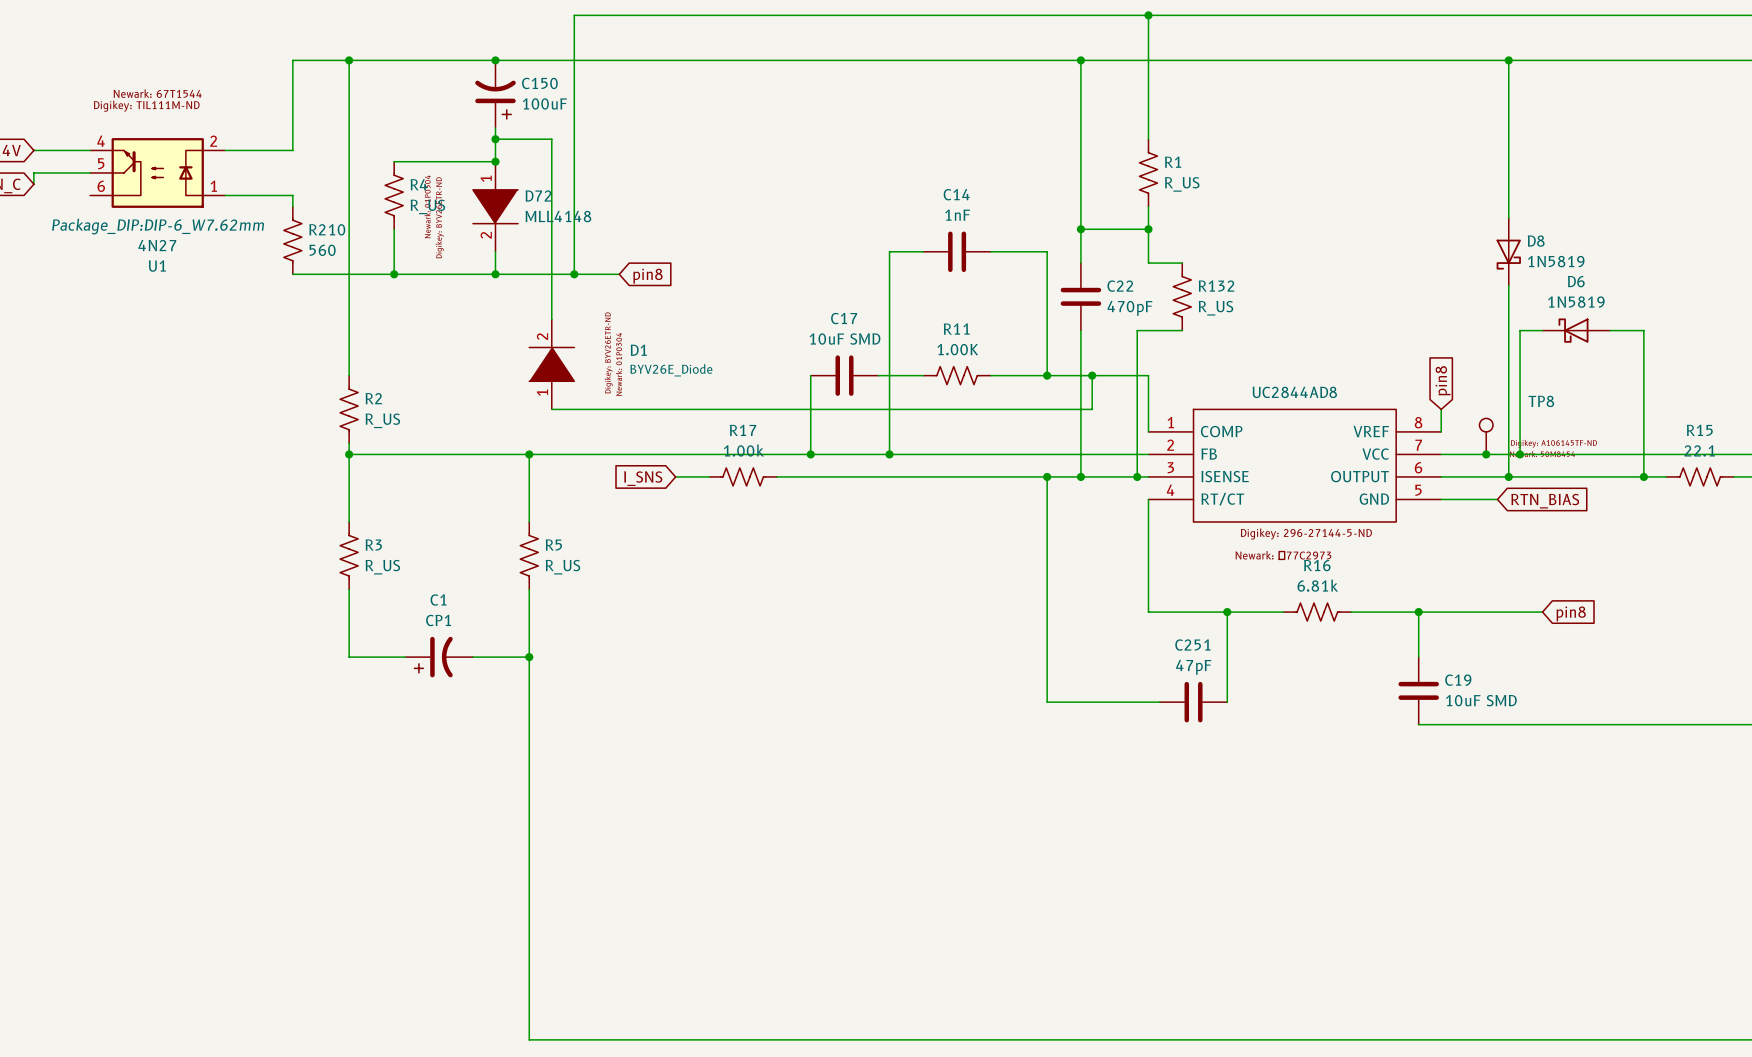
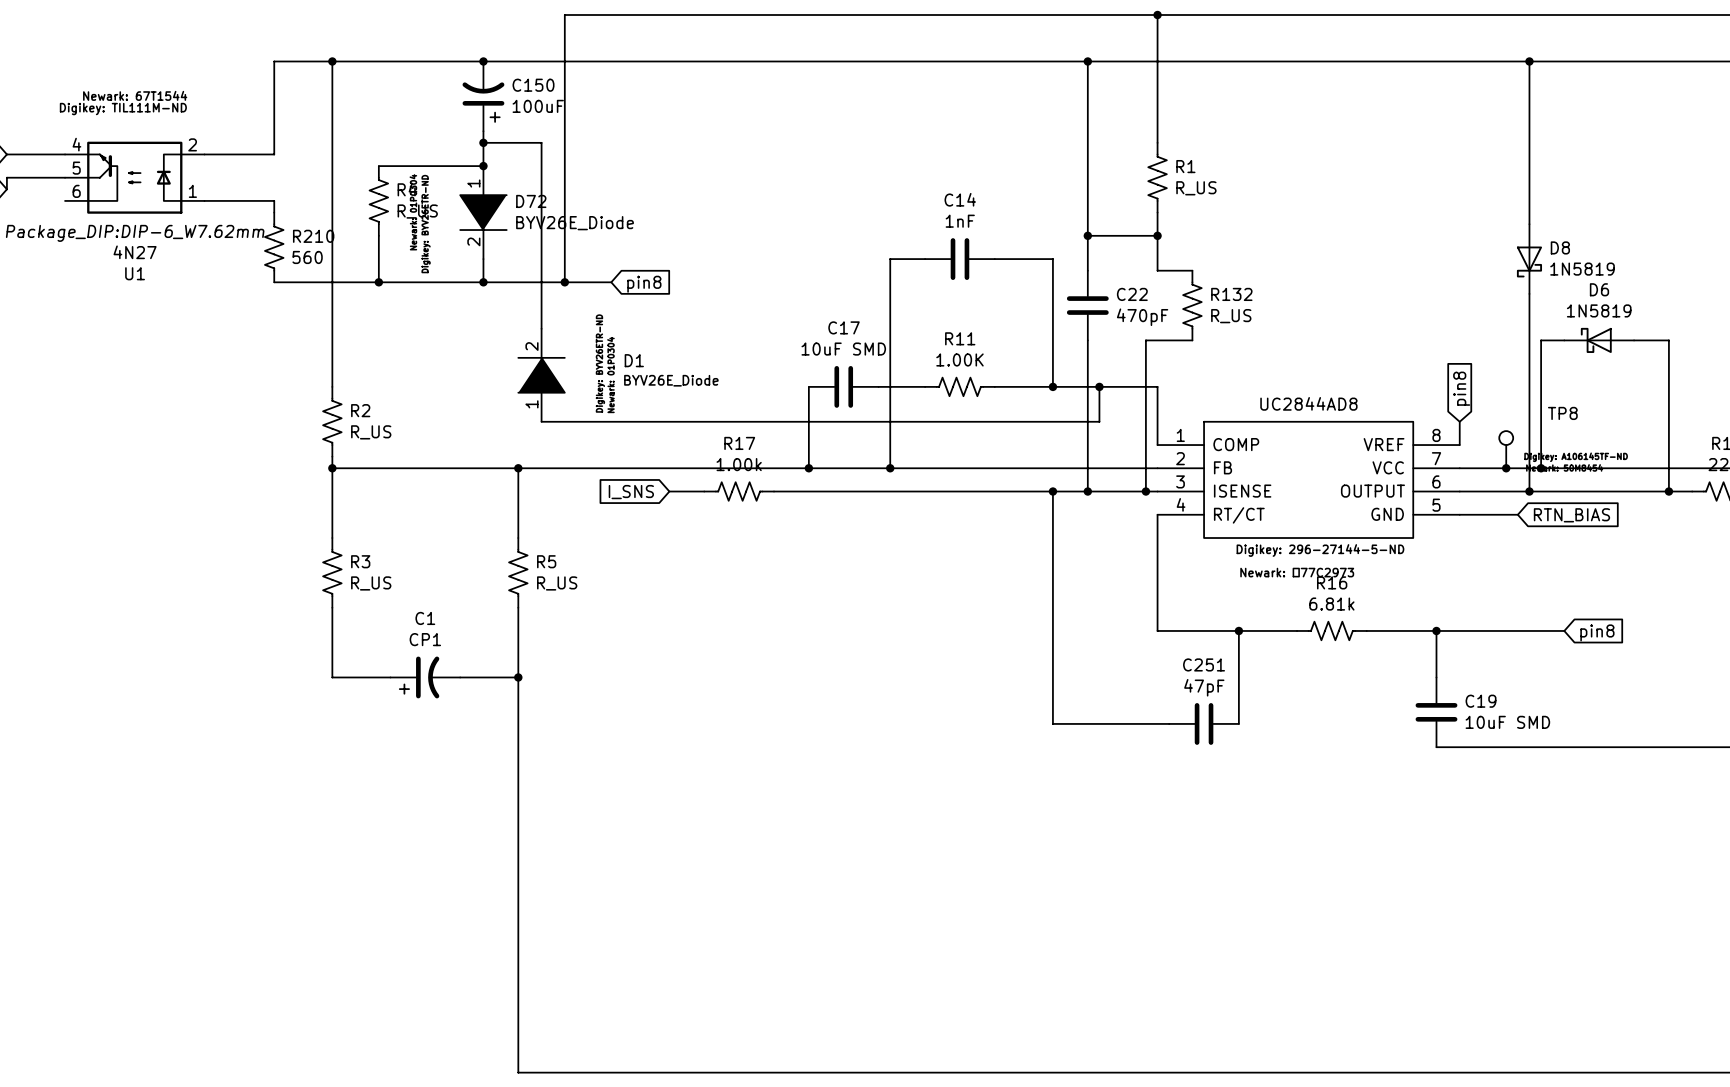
D72 value: MLL4148 (558, 216) -> BYV26E_Diode (575, 223)

